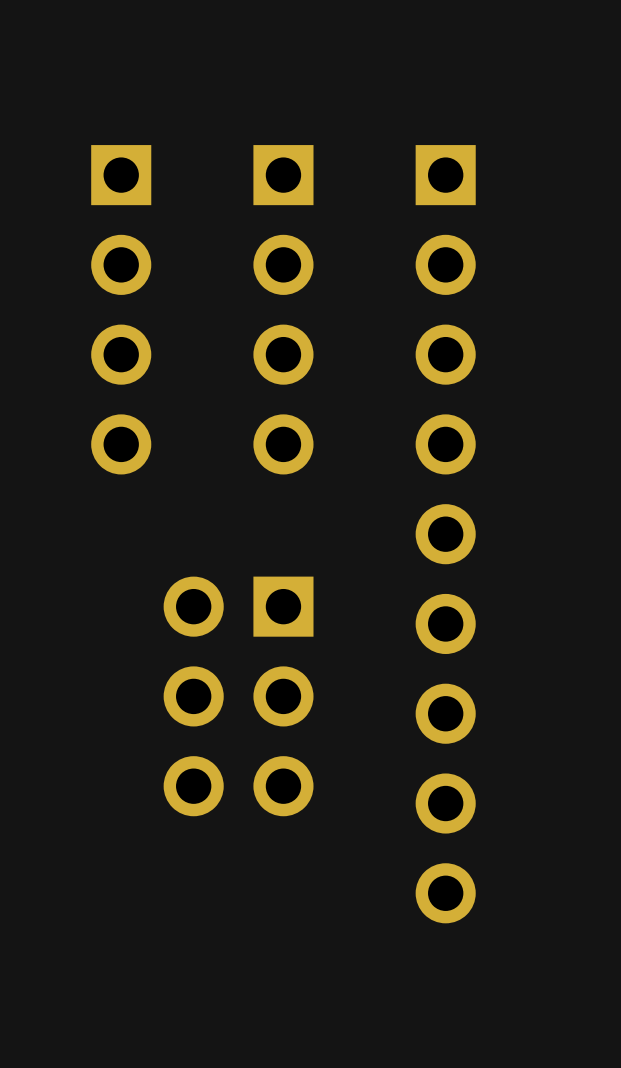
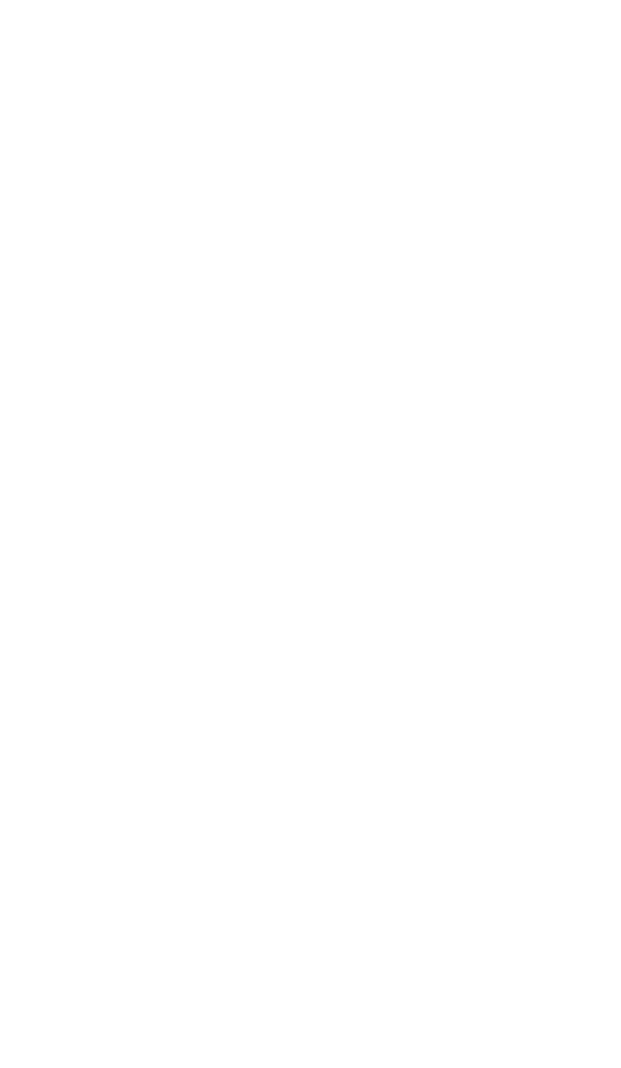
part: (121, 309) -> none
part: (283, 309) -> none
part: (445, 534) -> none
part: (238, 696) -> none

